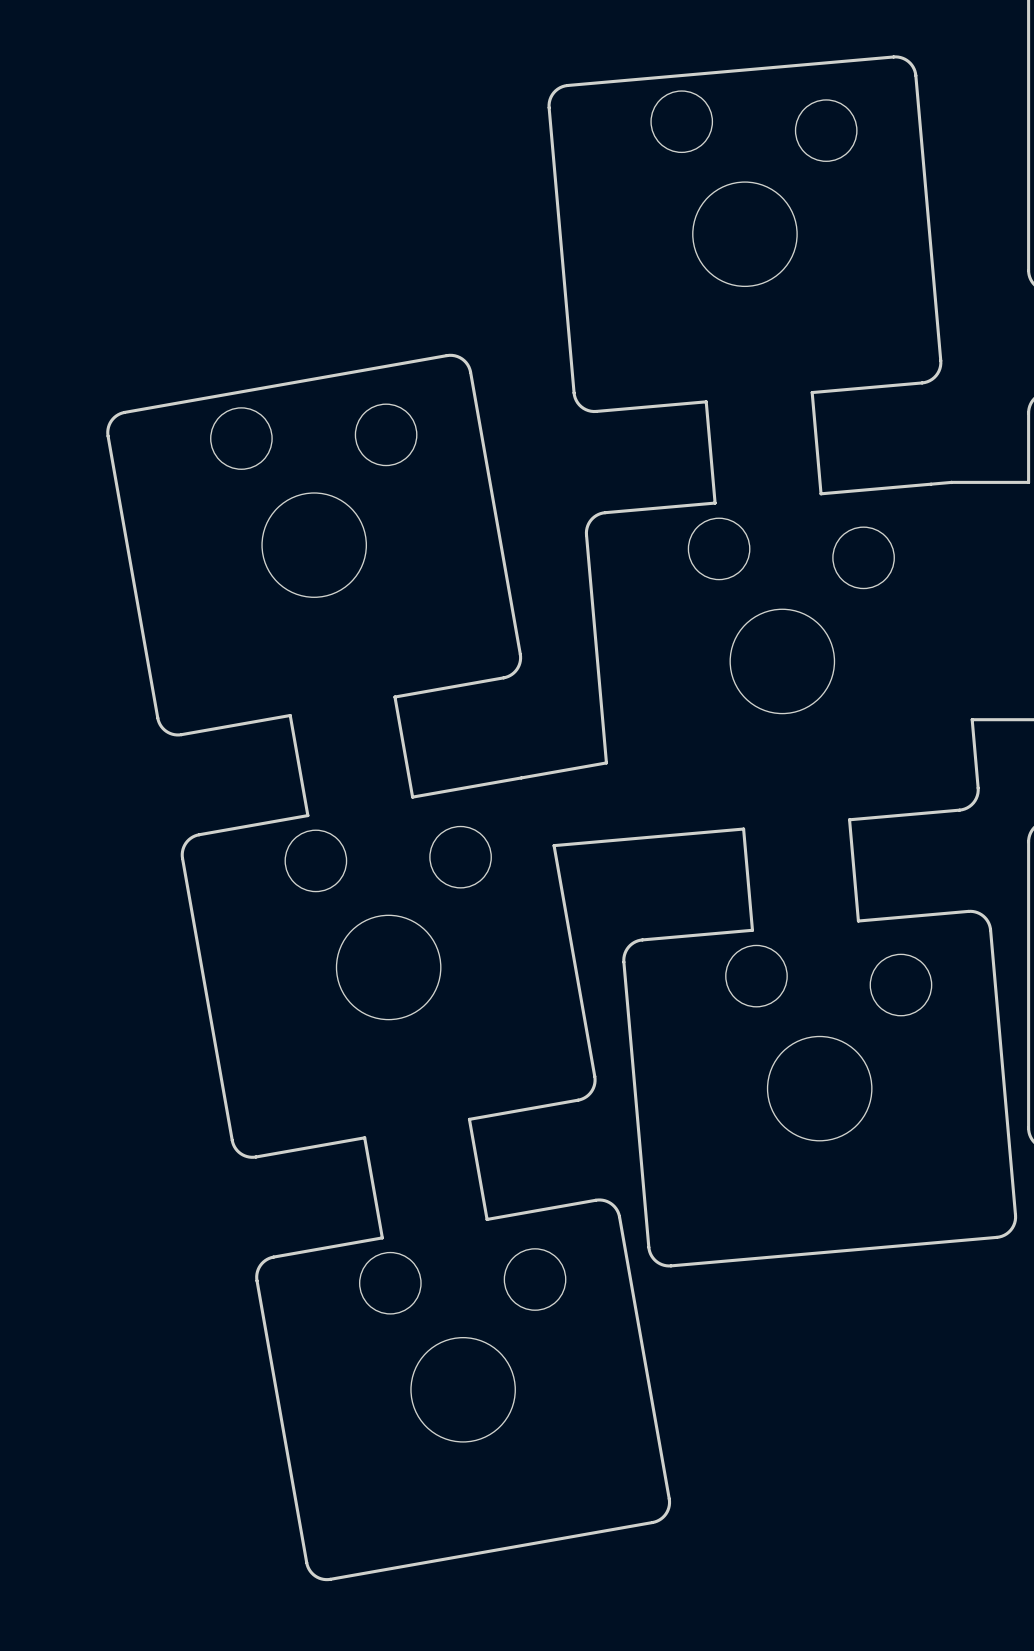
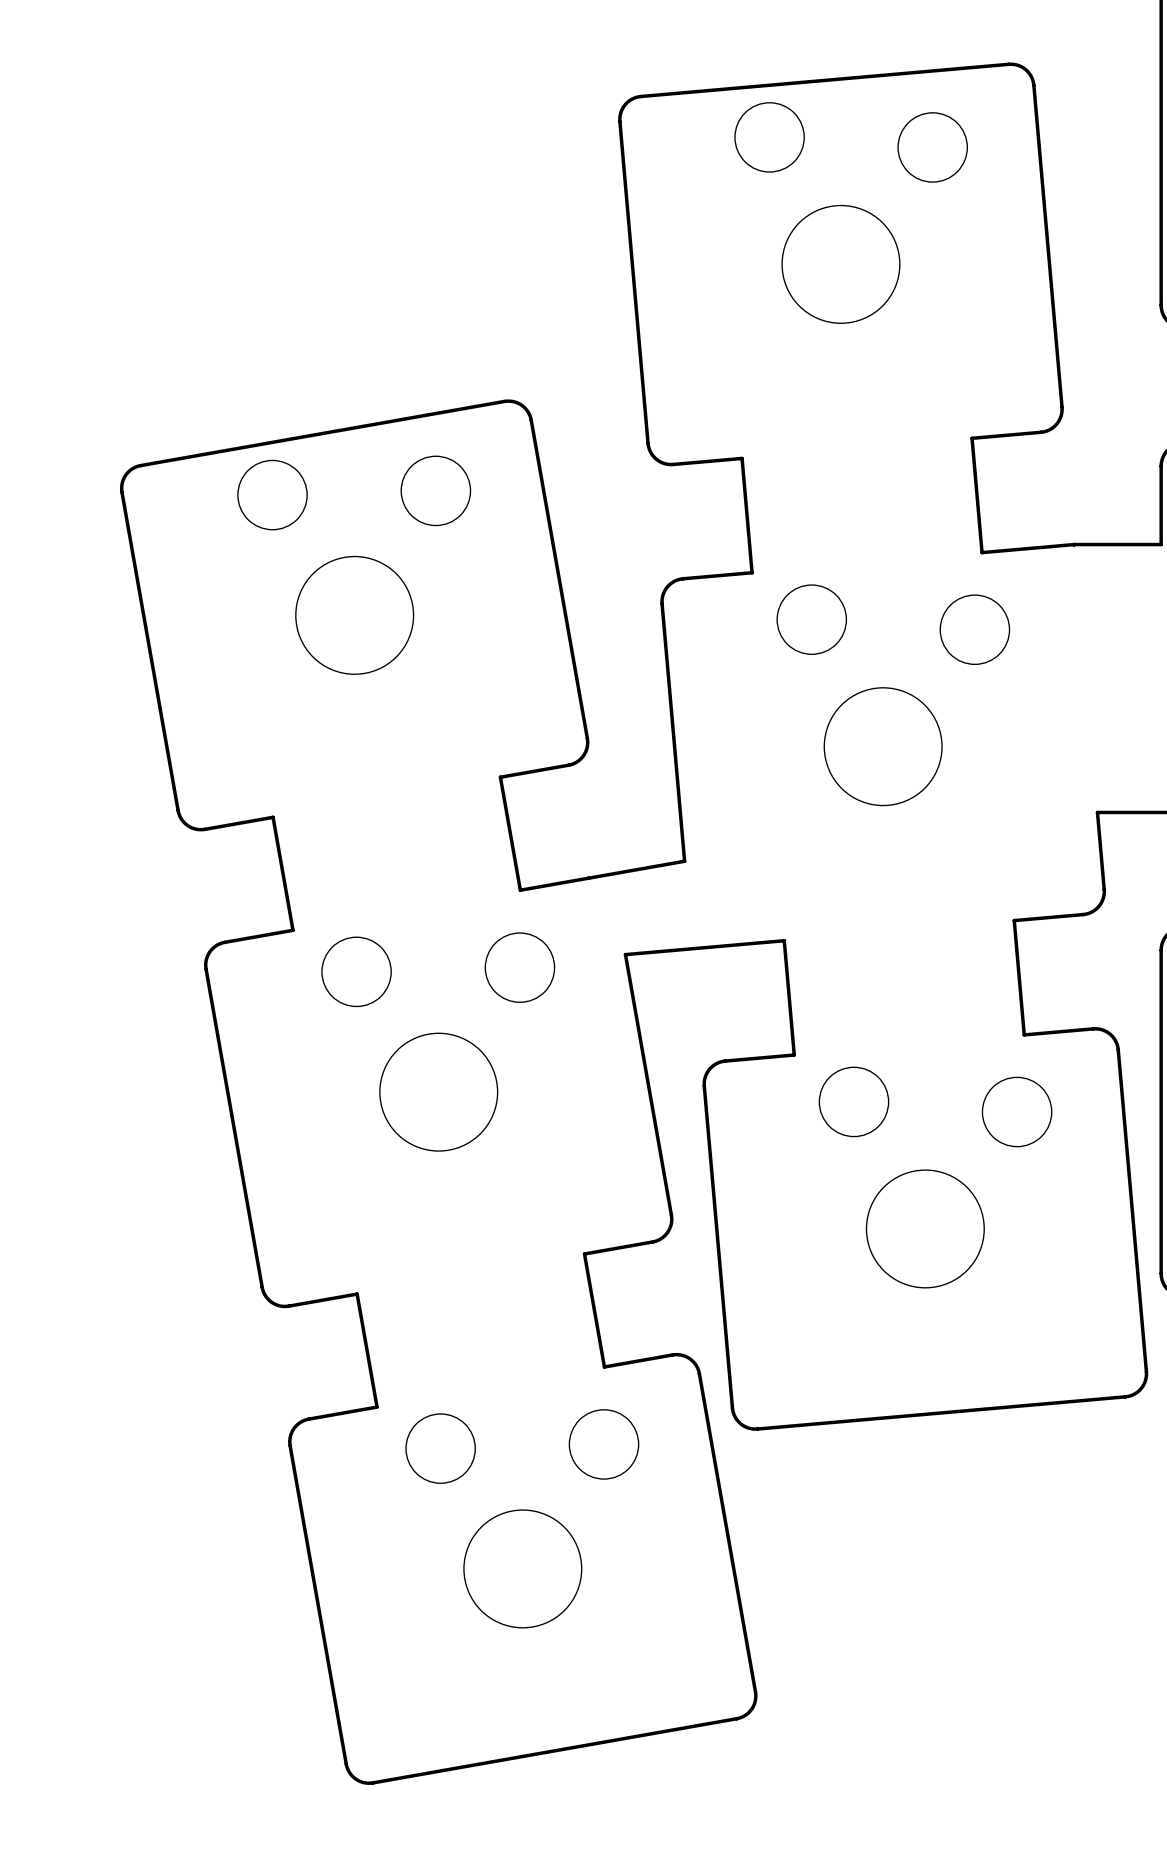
board edge: (861, 388) (812, 392) (821, 493) (869, 489) -> (972, 438) (982, 552)
board edge: (657, 406) (706, 401) (715, 503) (666, 507) -> (742, 458) (752, 572)
board edge: (443, 688) (394, 697) (412, 797) (460, 788) -> (500, 777) (520, 890)
board edge: (241, 724) (290, 715) (307, 815) (259, 824) -> (273, 817) (293, 930)
board edge: (898, 815) (849, 819) (858, 921) (907, 916) -> (1014, 920) (1024, 1034)
board edge: (694, 833) (743, 829) (752, 930) (703, 934) -> (784, 940) (794, 1055)
board edge: (517, 1110) (469, 1119) (487, 1219) (535, 1210) -> (584, 1254) (604, 1367)
board edge: (316, 1146) (364, 1137) (382, 1237) (334, 1246) -> (357, 1294) (377, 1407)

